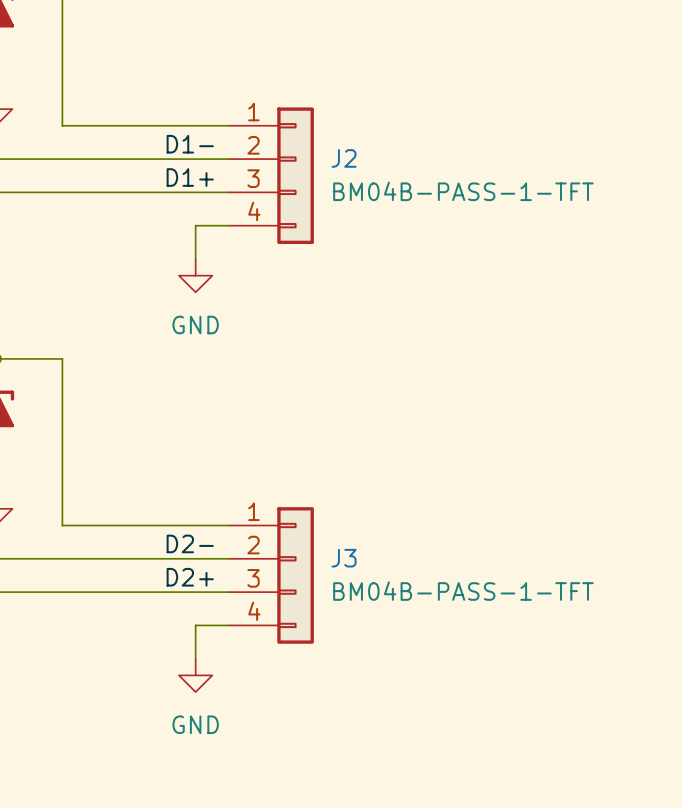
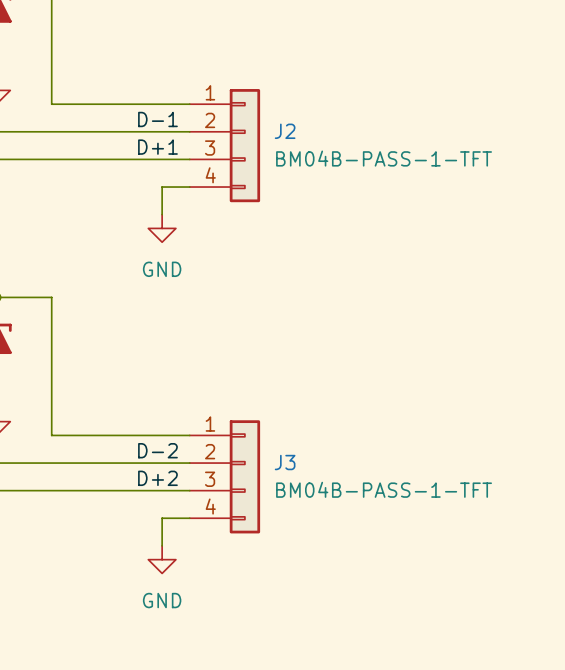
label: D1- (190, 144) -> D-1 (157, 119)
label: D1+ (190, 177) -> D+1 (157, 147)
label: D2- (190, 543) -> D-2 (157, 450)
label: D2+ (190, 577) -> D+2 (157, 478)

